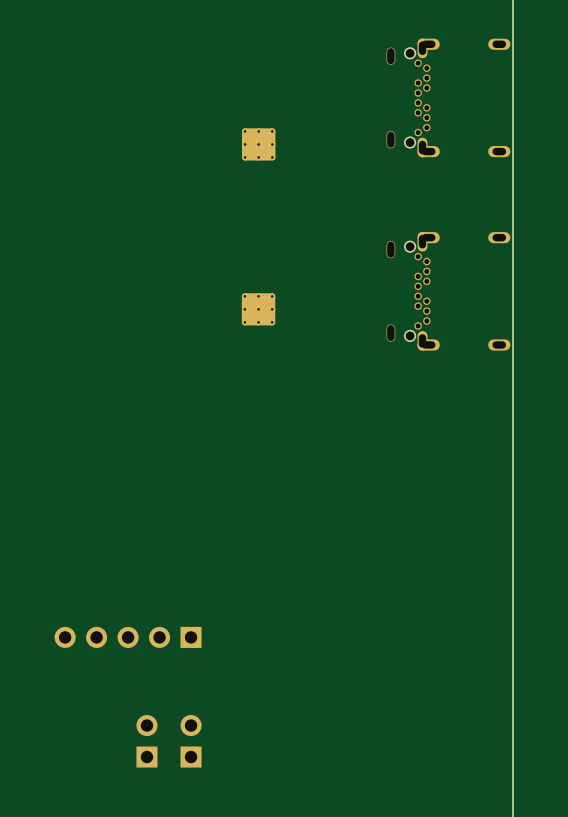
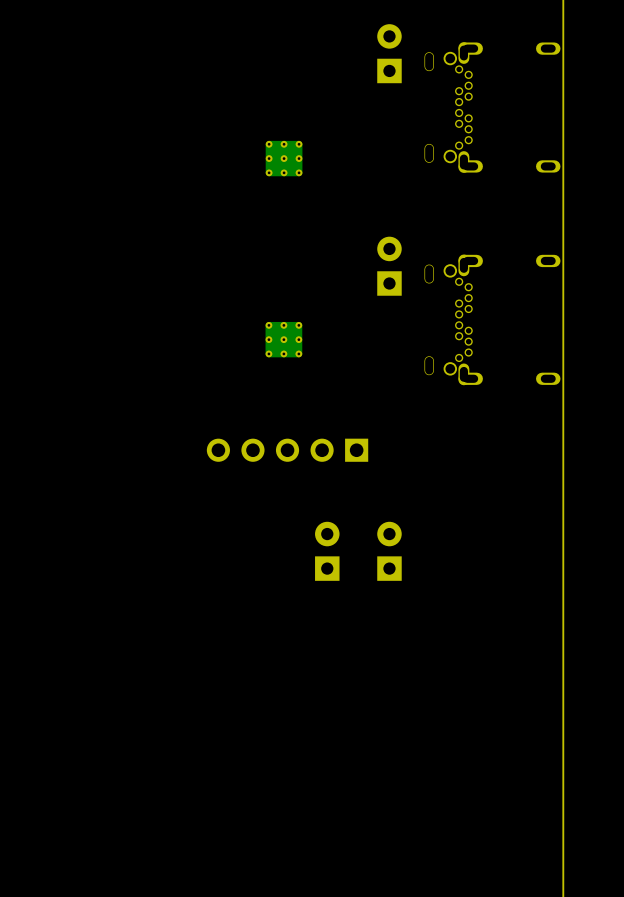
part: none -> (389, 53)
part: none -> (389, 266)
part: none -> (327, 551)
part: none -> (389, 551)
part position: (128, 637) -> (287, 450)
part: (146, 741) -> none
part: (191, 741) -> none

